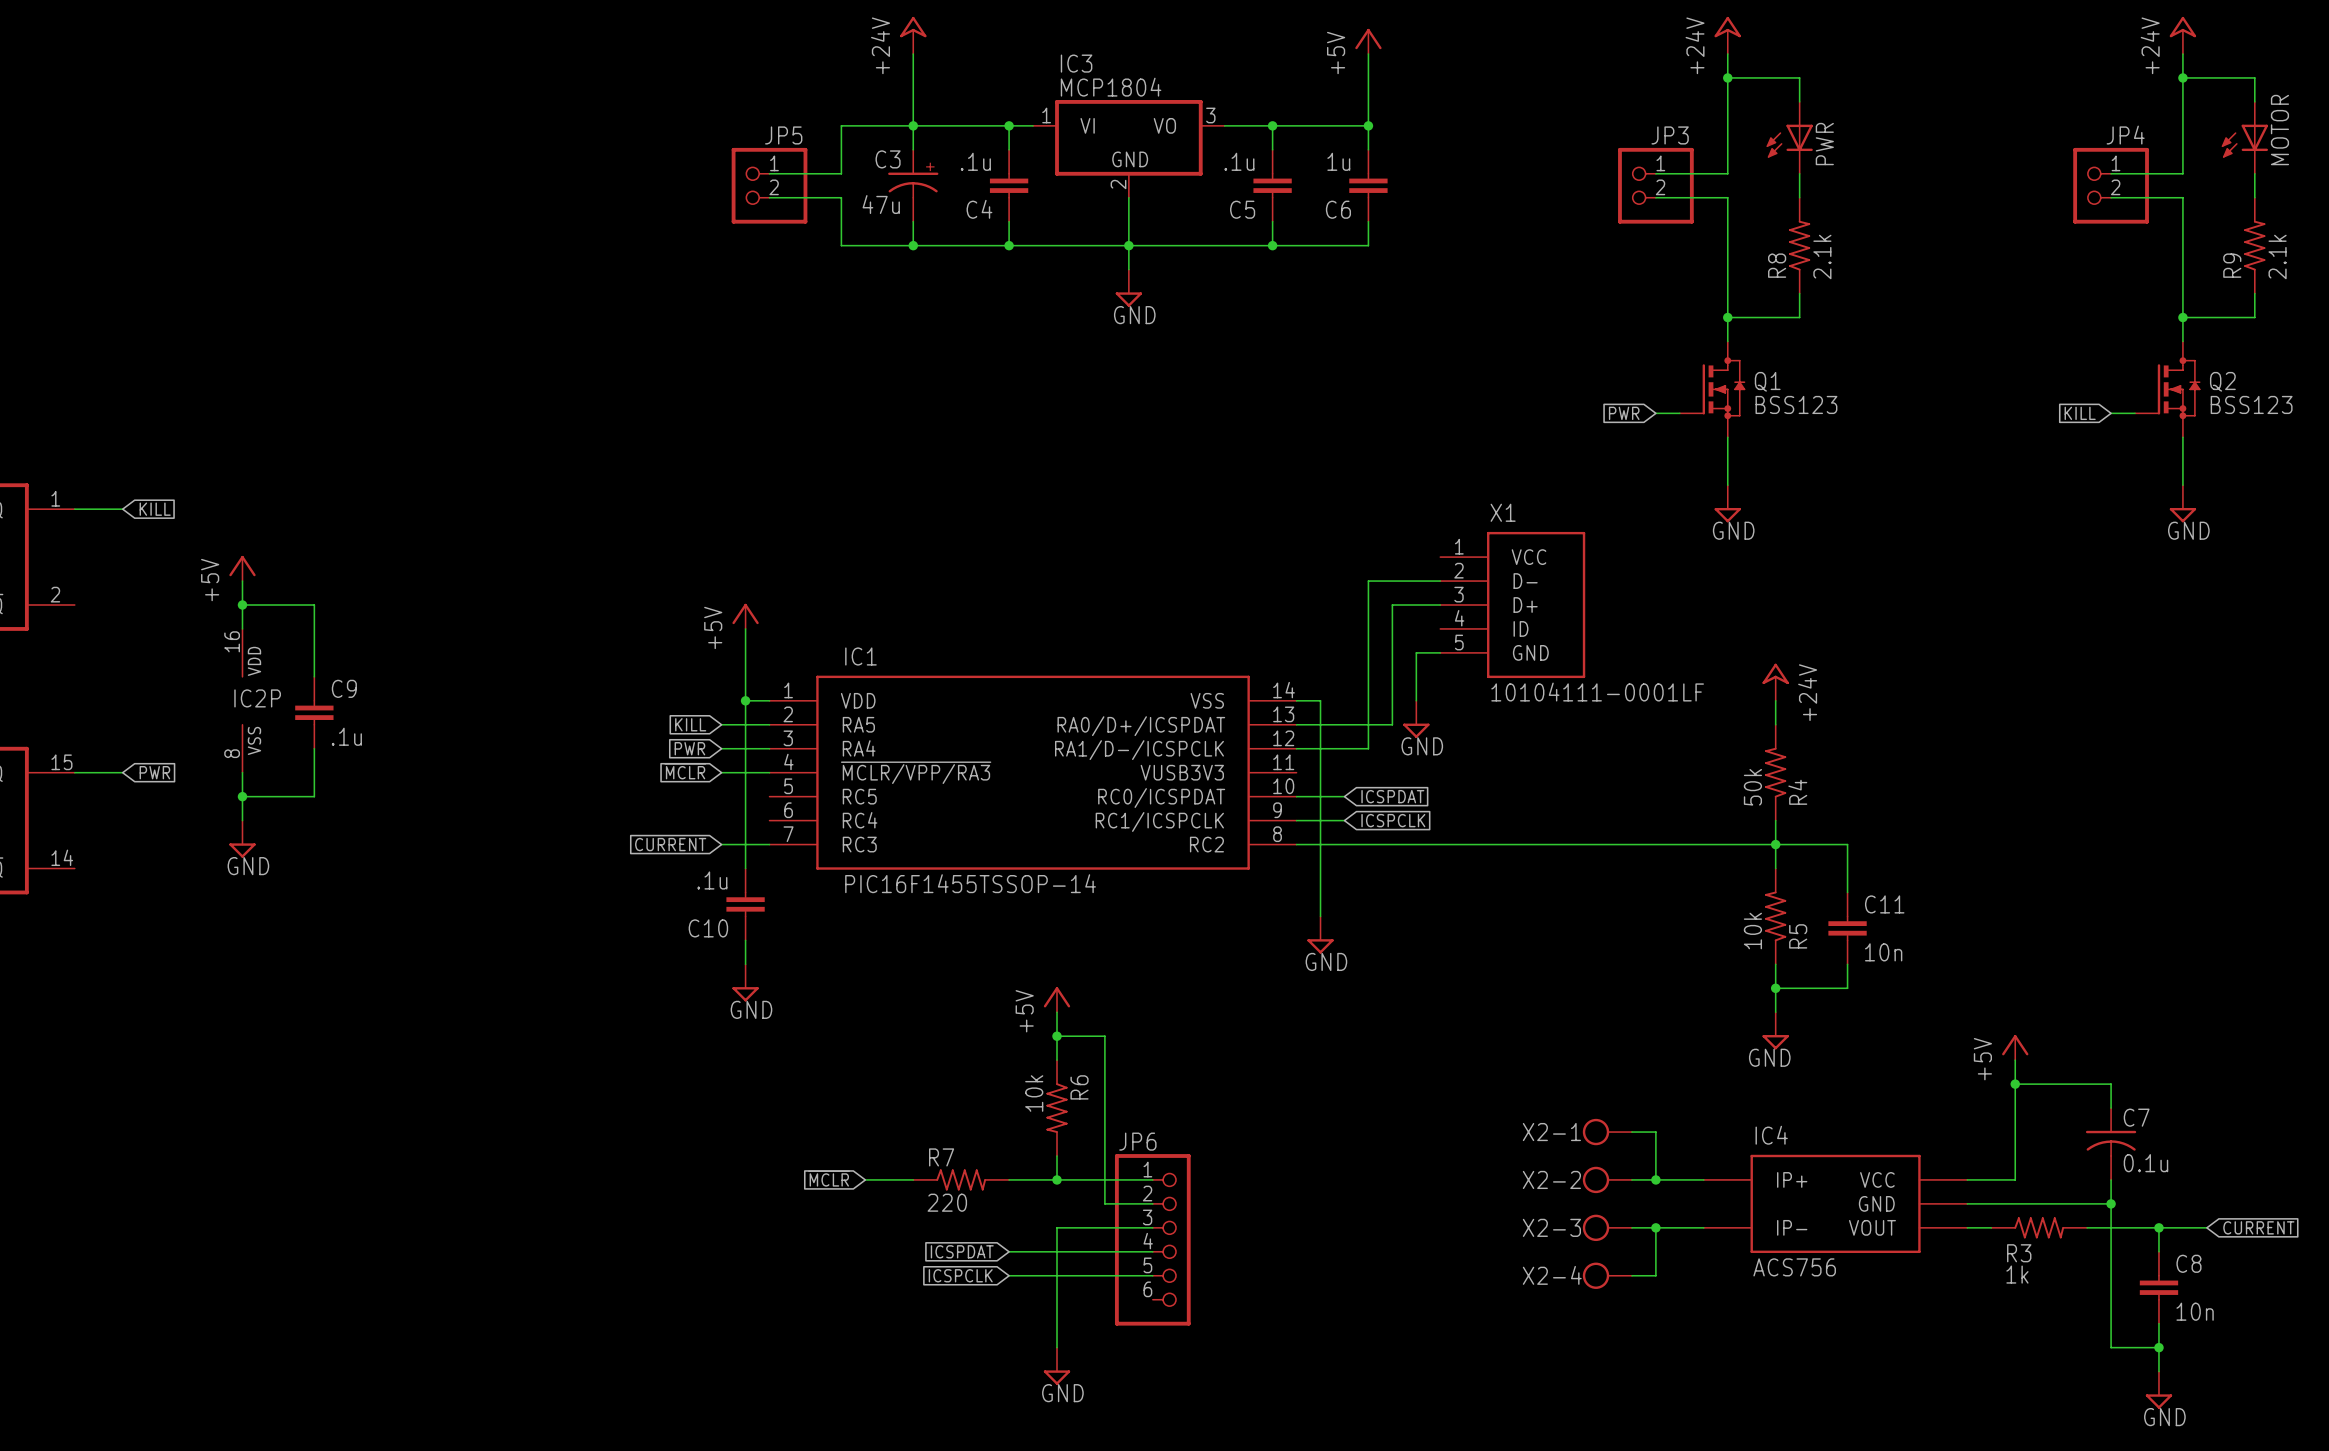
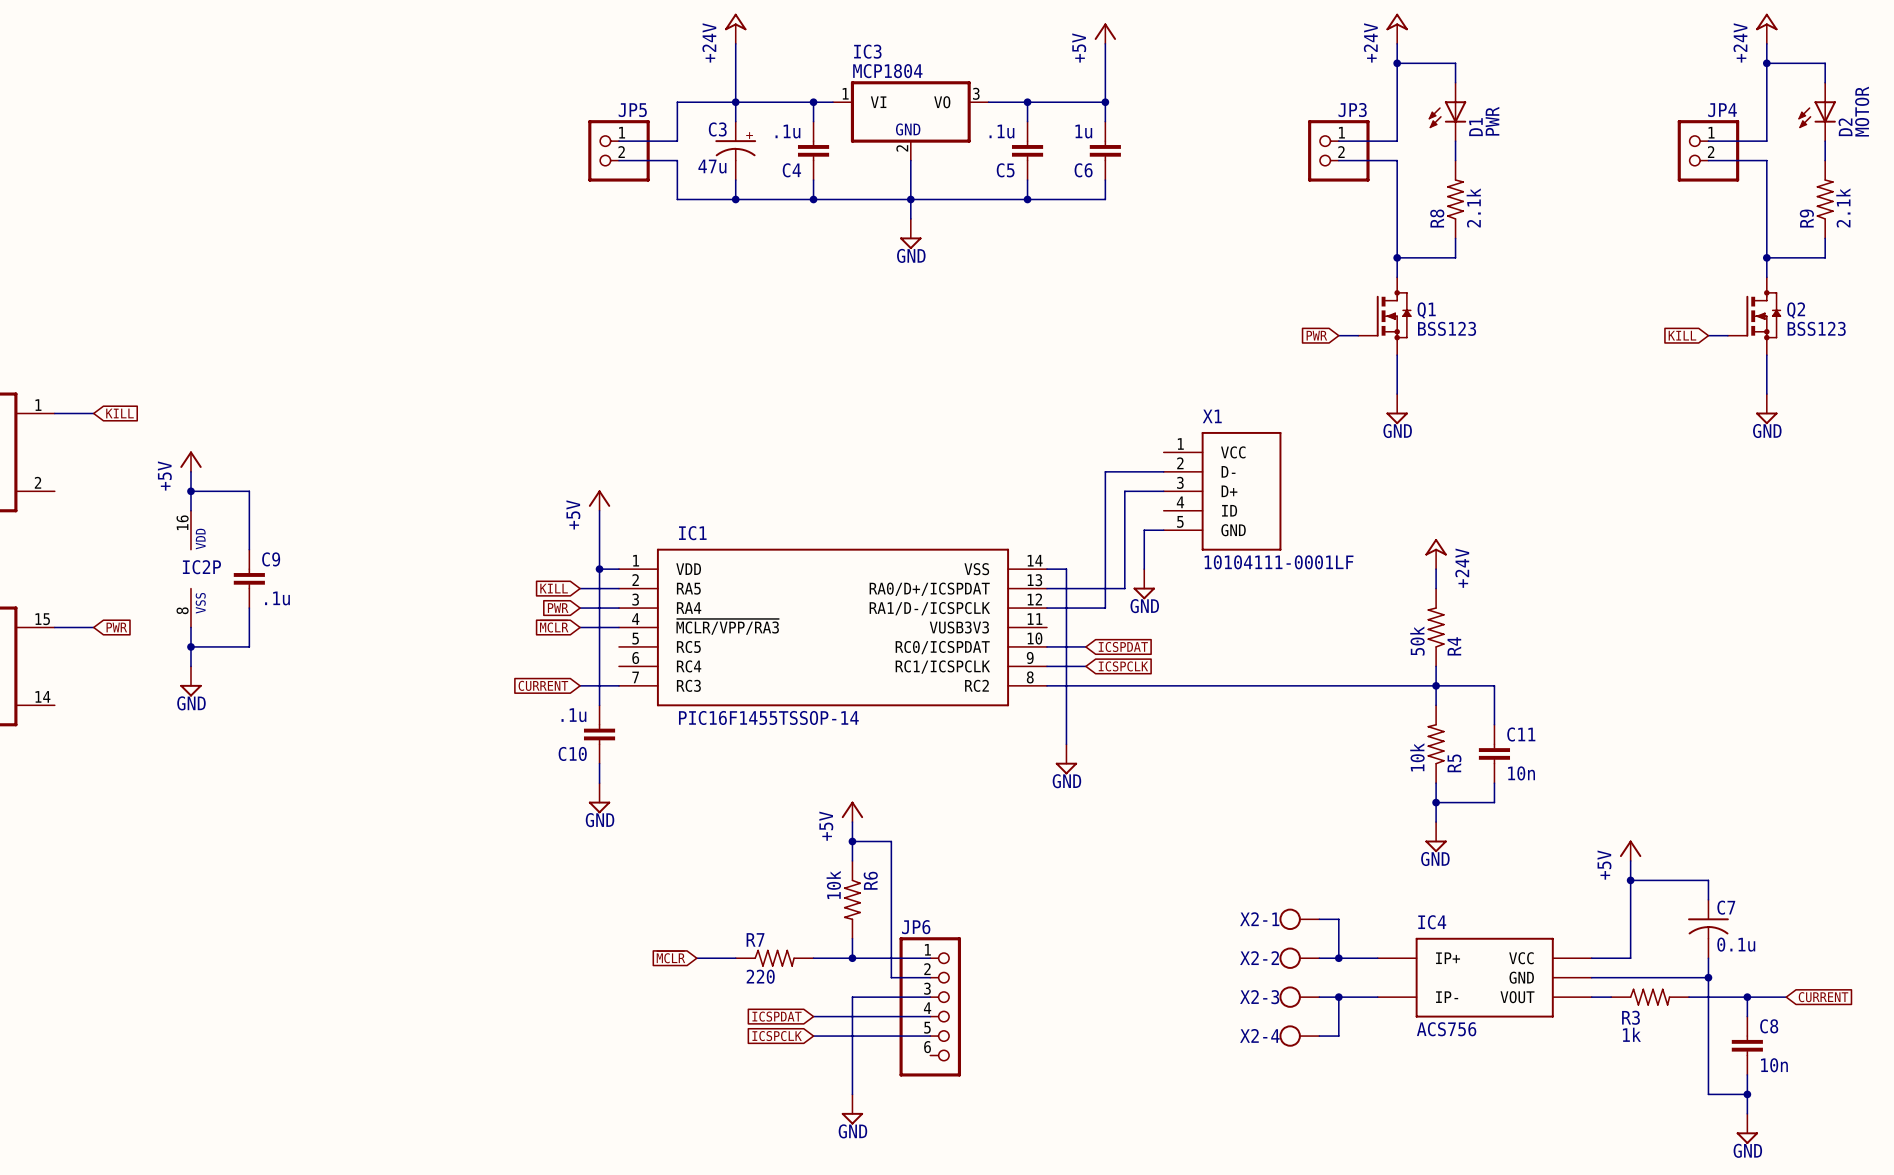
MOTOR name: MOTOR (2279, 130) -> D2 (1845, 127)
MOTOR value: none -> MOTOR (1862, 111)
PWR name: PWR (1824, 144) -> D1 (1475, 127)
PWR value: none -> PWR (1492, 121)

